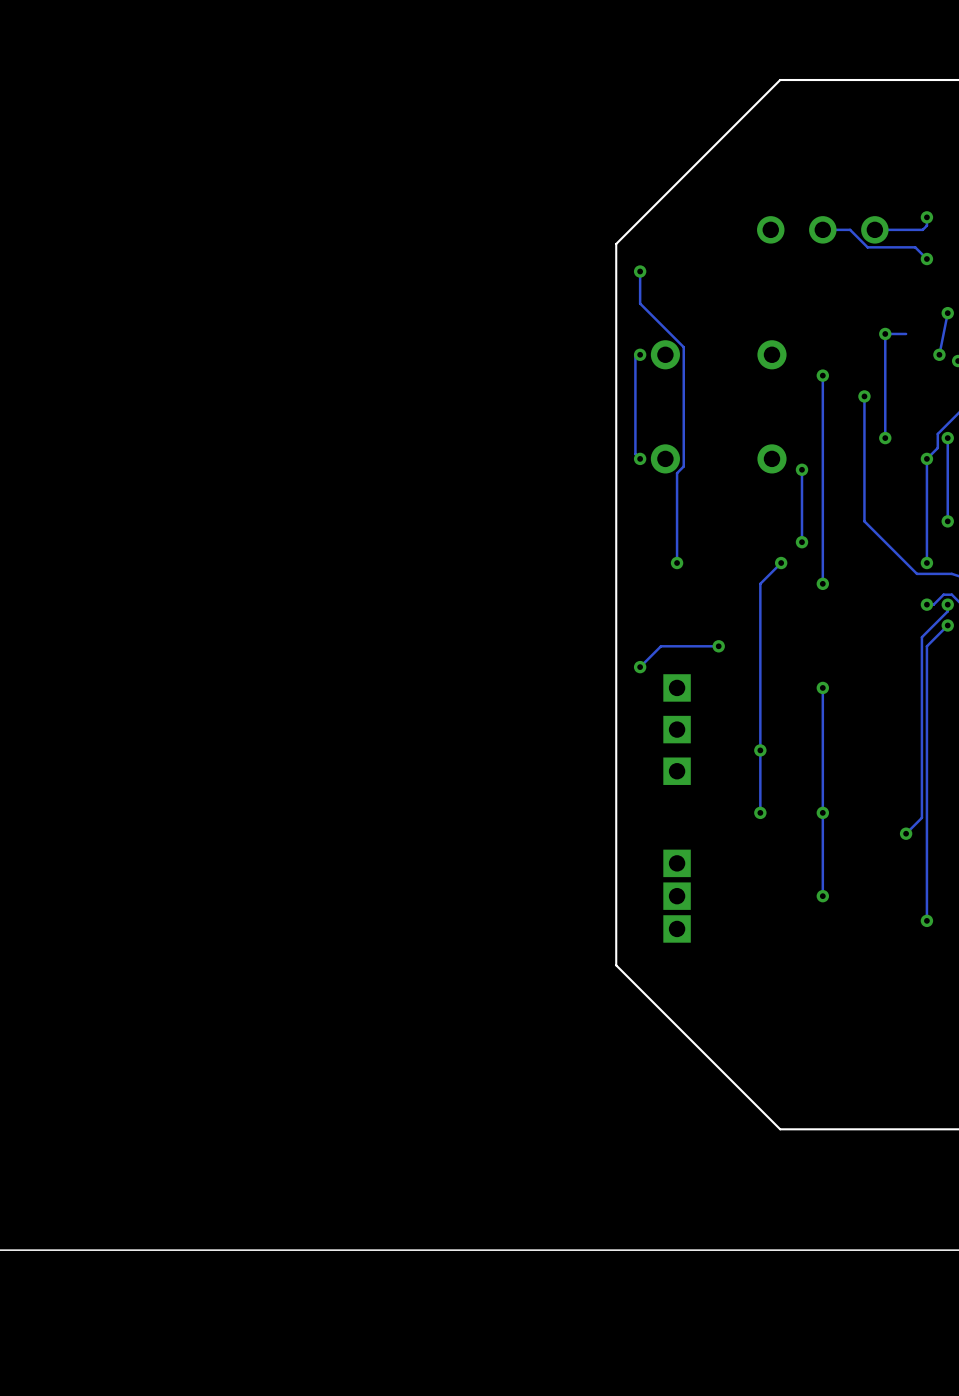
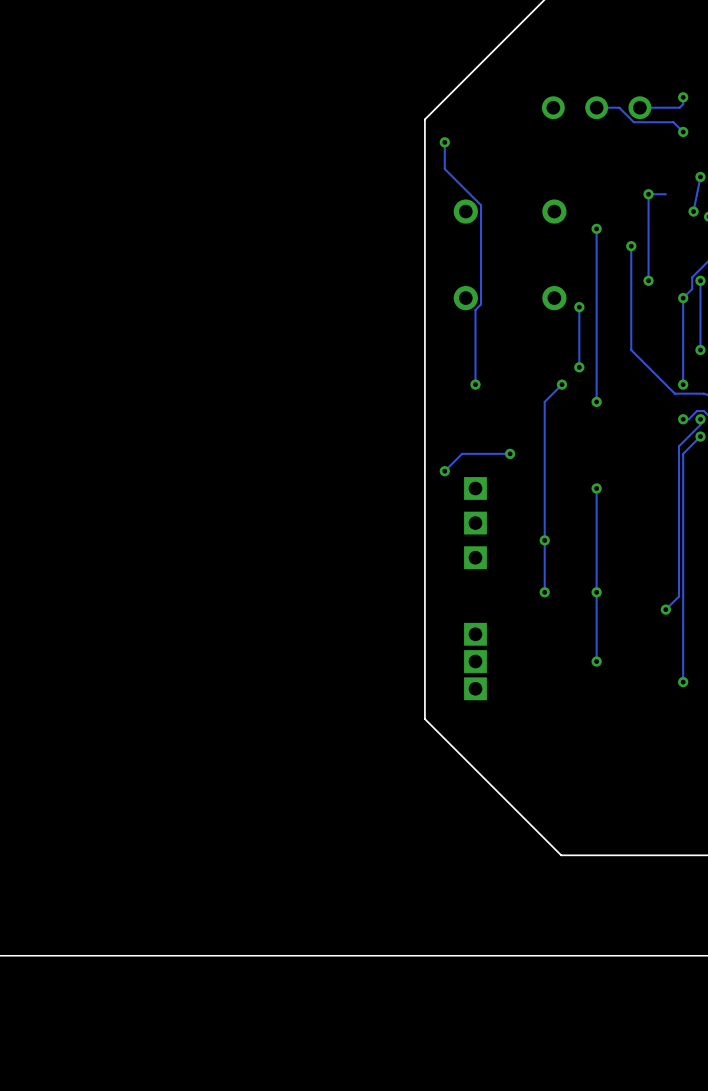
track: (640, 354) (635, 354) (635, 454) (640, 458) -> none
via: (640, 354) -> none
via: (640, 458) -> none

